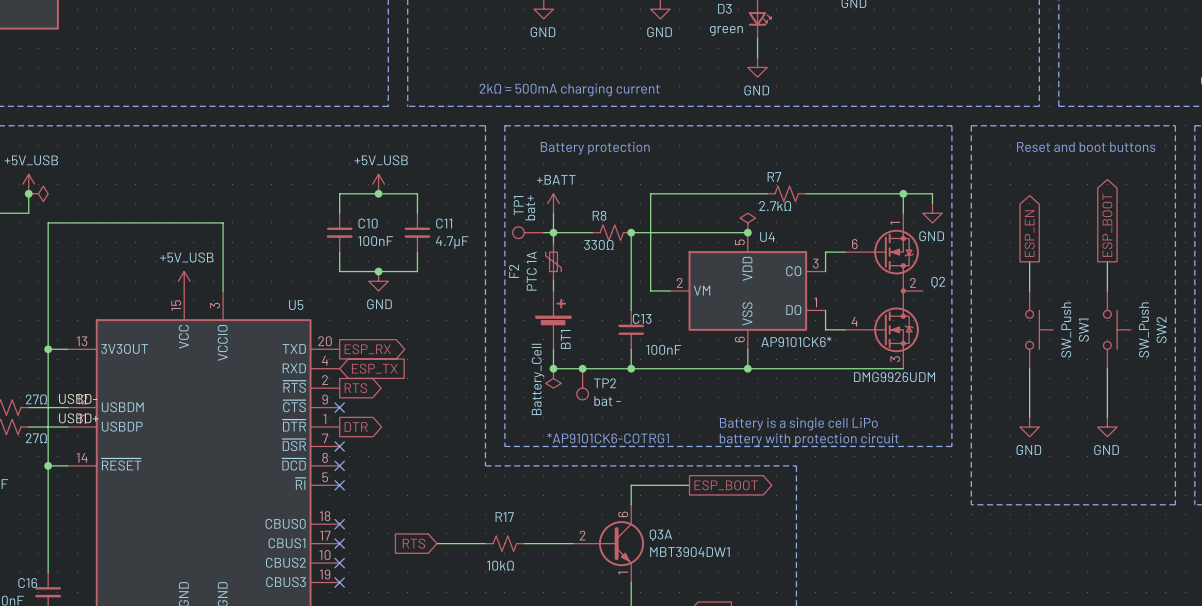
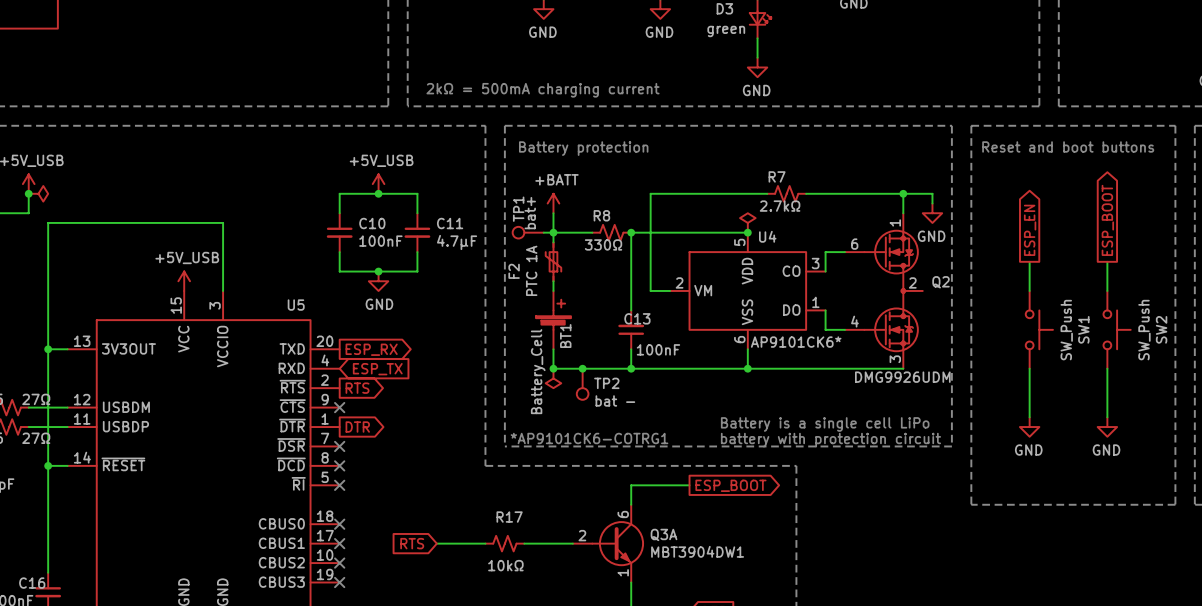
label: USBD- (78, 398) -> none
label: USBD+ (78, 418) -> none

